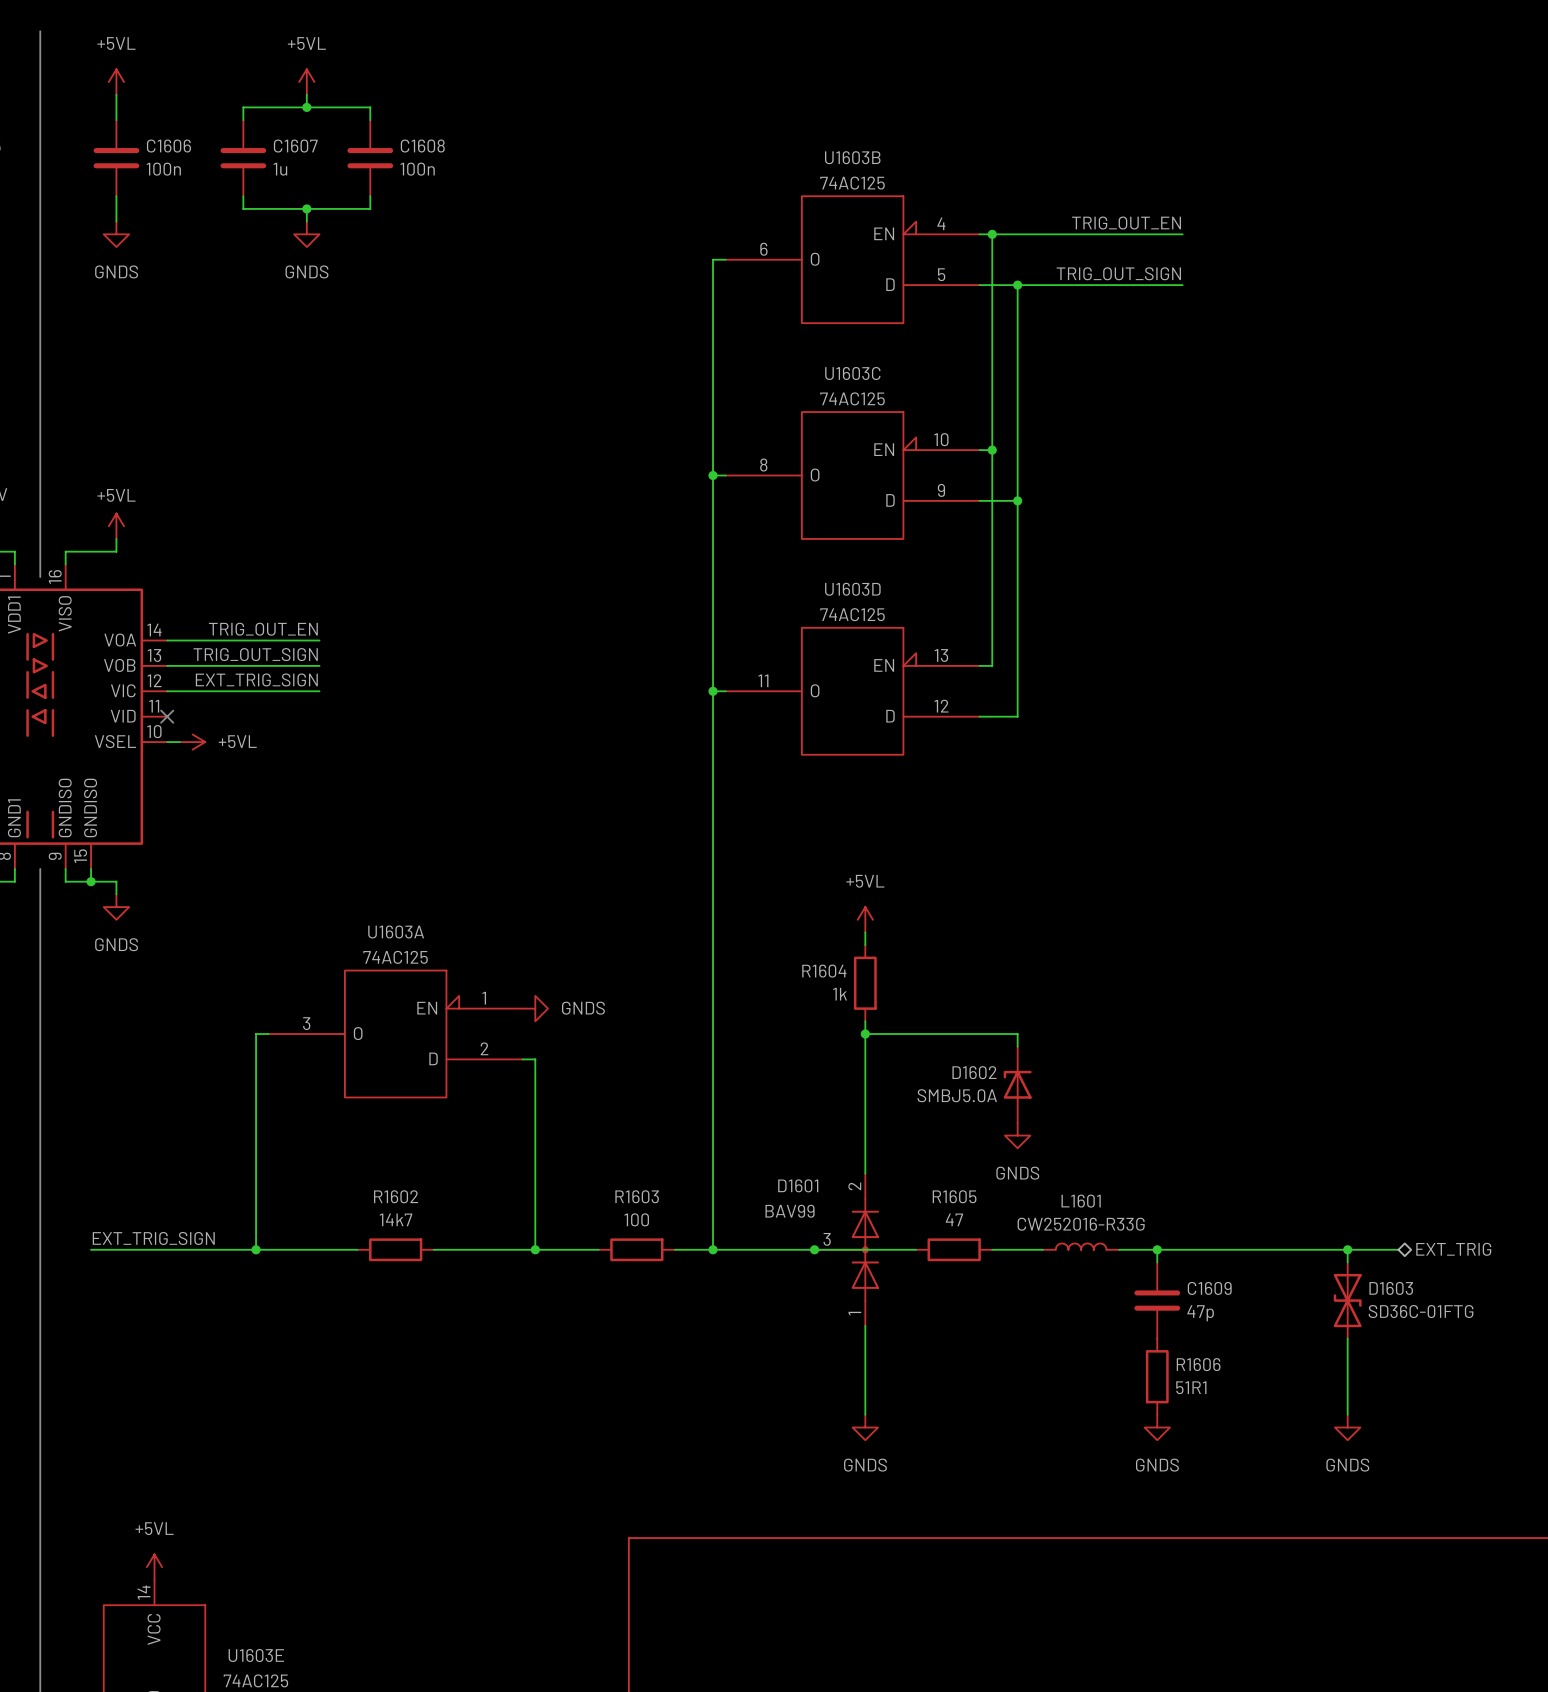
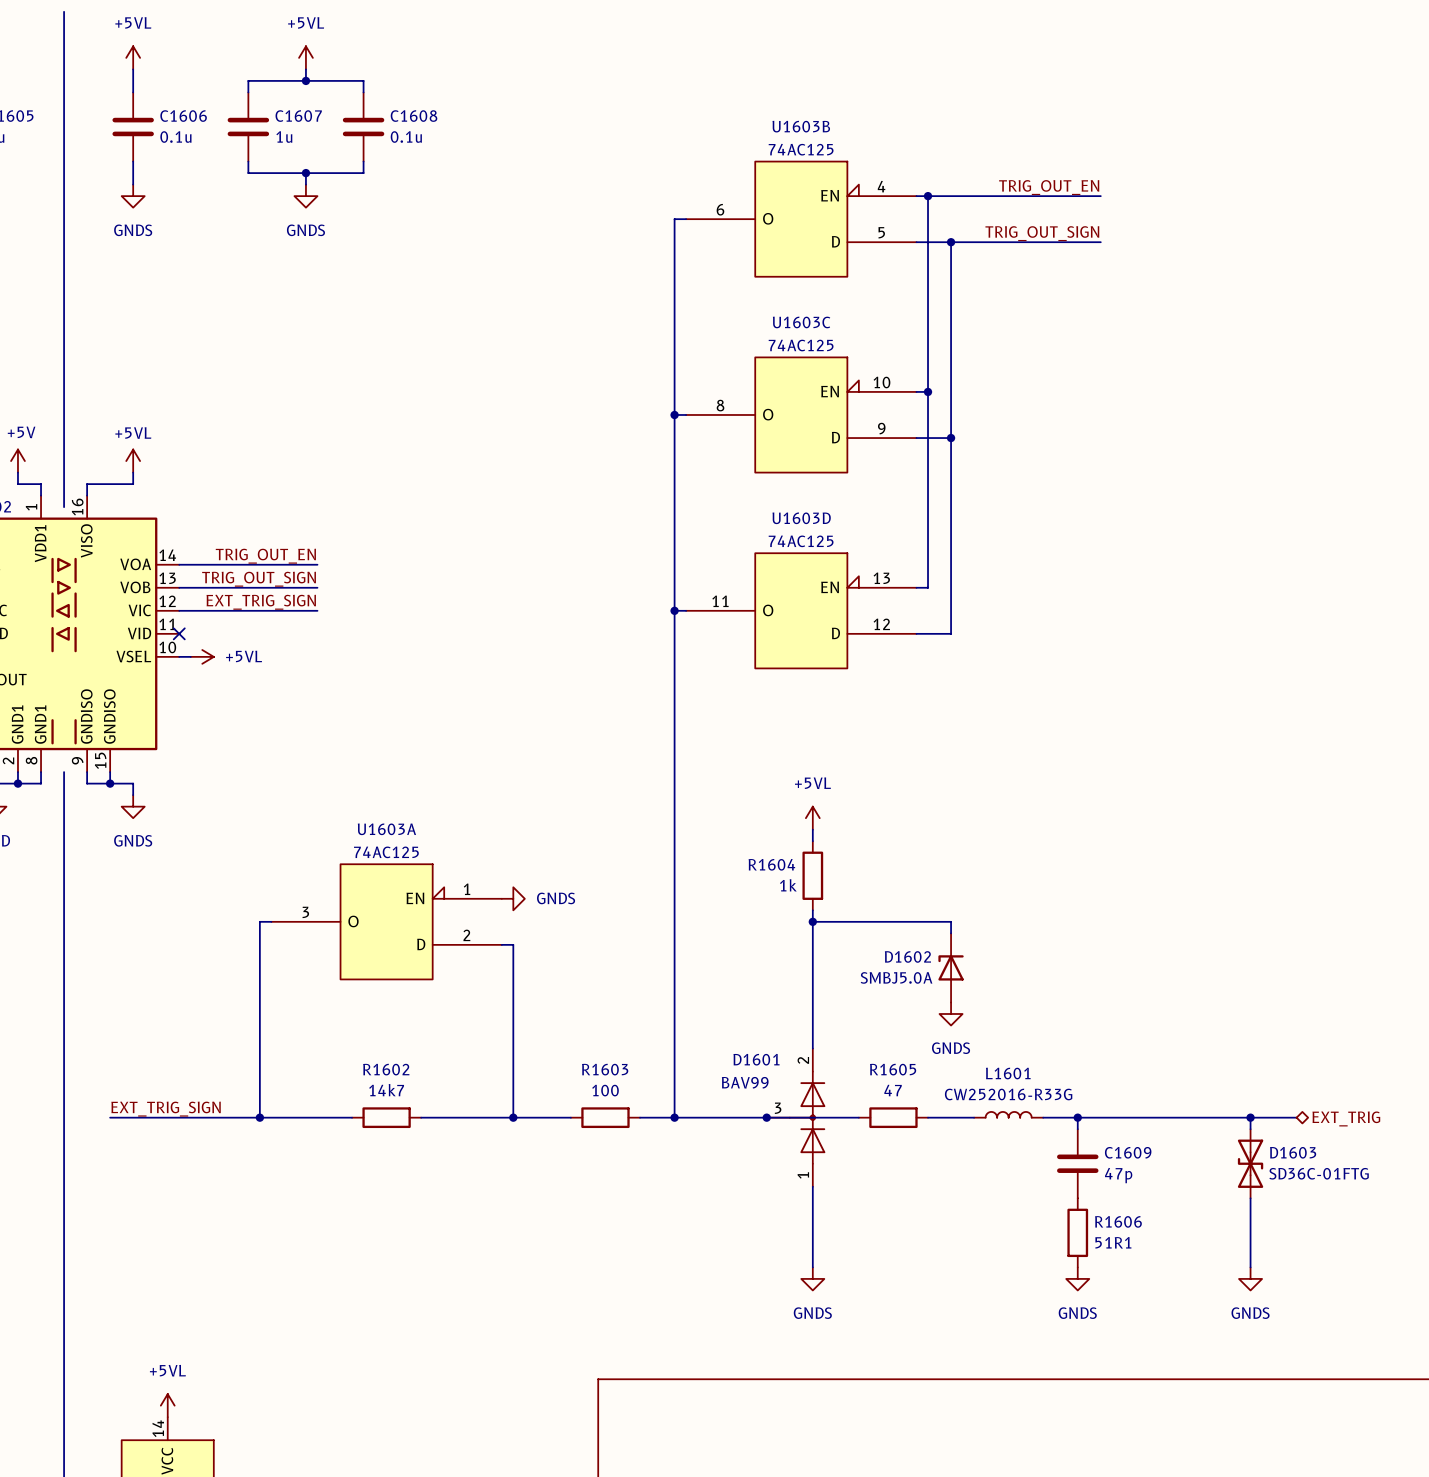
C1606 value: 100n (163, 169) -> 0.1u (175, 137)
C1608 value: 100n (417, 169) -> 0.1u (406, 137)

